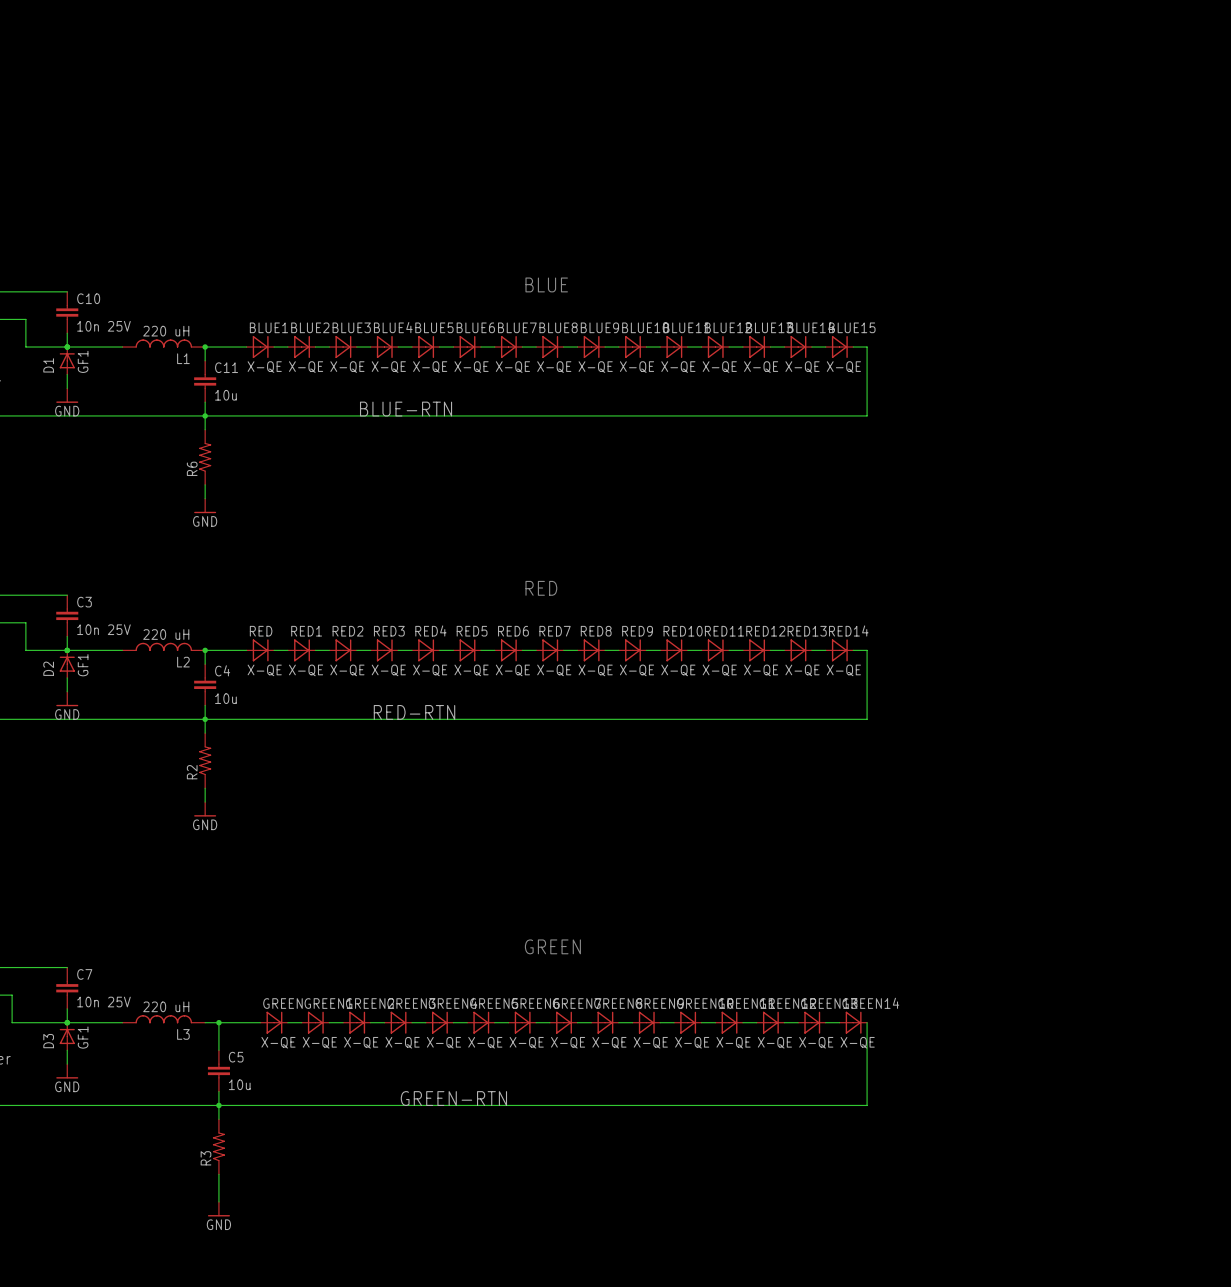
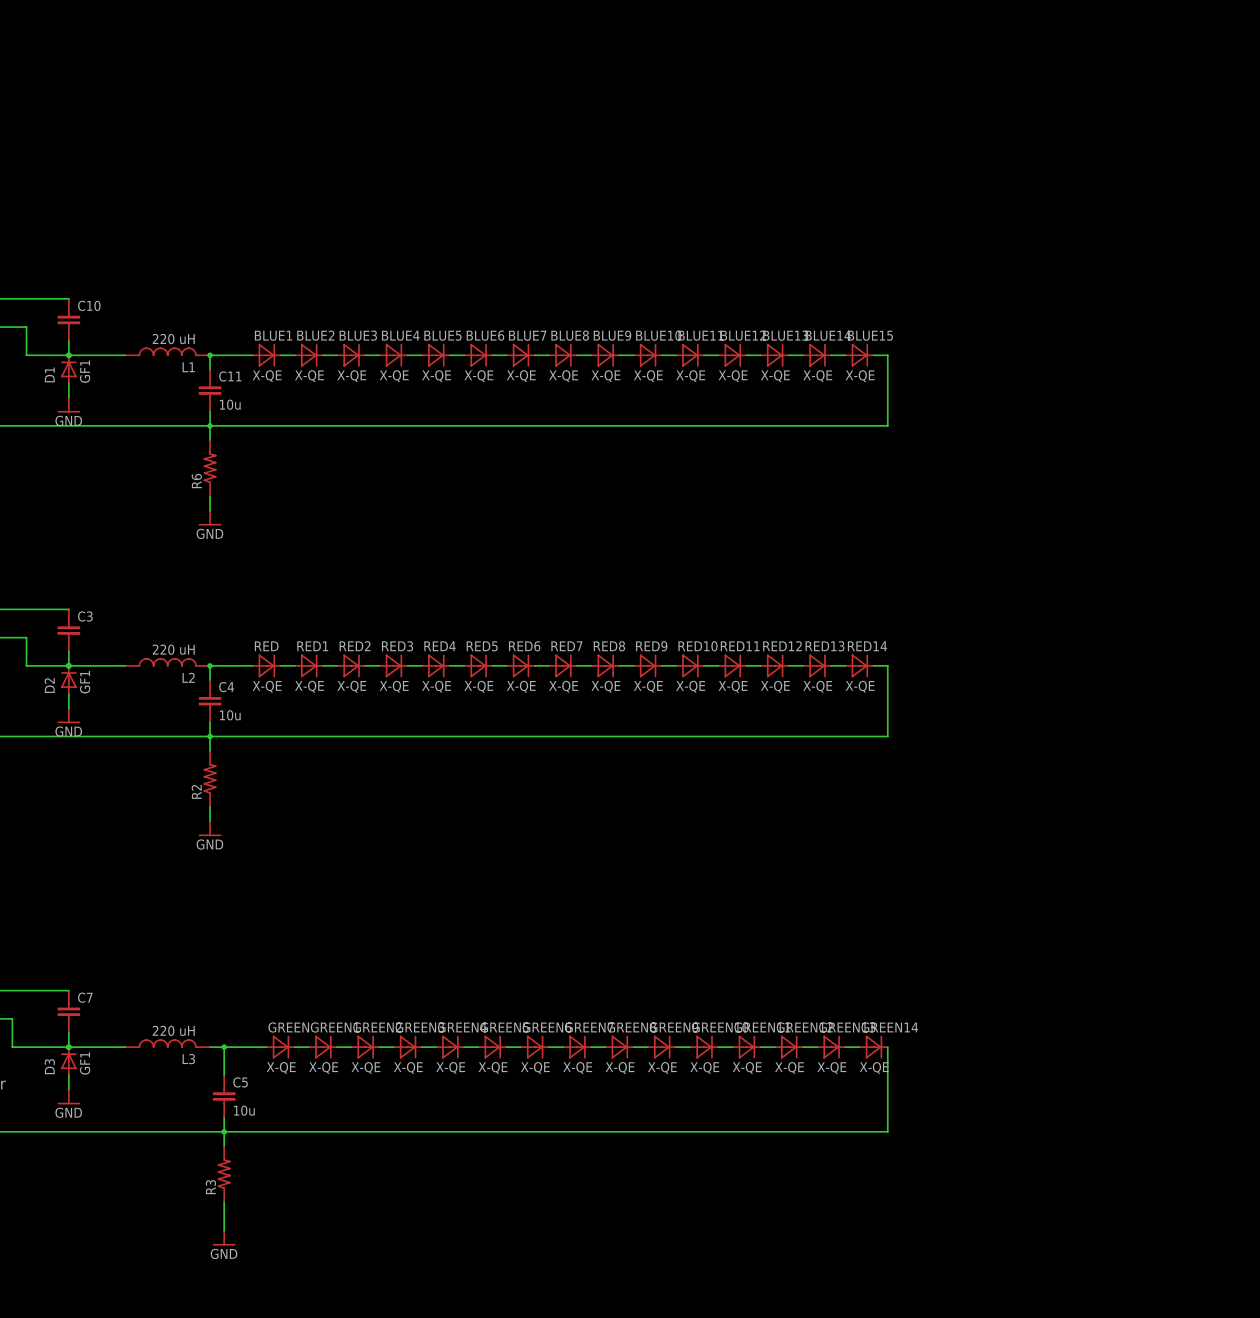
text: BLUE (546, 284) -> none
C10 value: 10n 25V (103, 326) -> none
label: BLUE-RTN (406, 409) -> none
text: RED (541, 588) -> none
C3 value: 10n 25V (103, 629) -> none
label: RED-RTN (414, 712) -> none
text: GREEN (552, 946) -> none
C7 value: 10n 25V (103, 1002) -> none
label: GREEN-RTN (453, 1098) -> none

